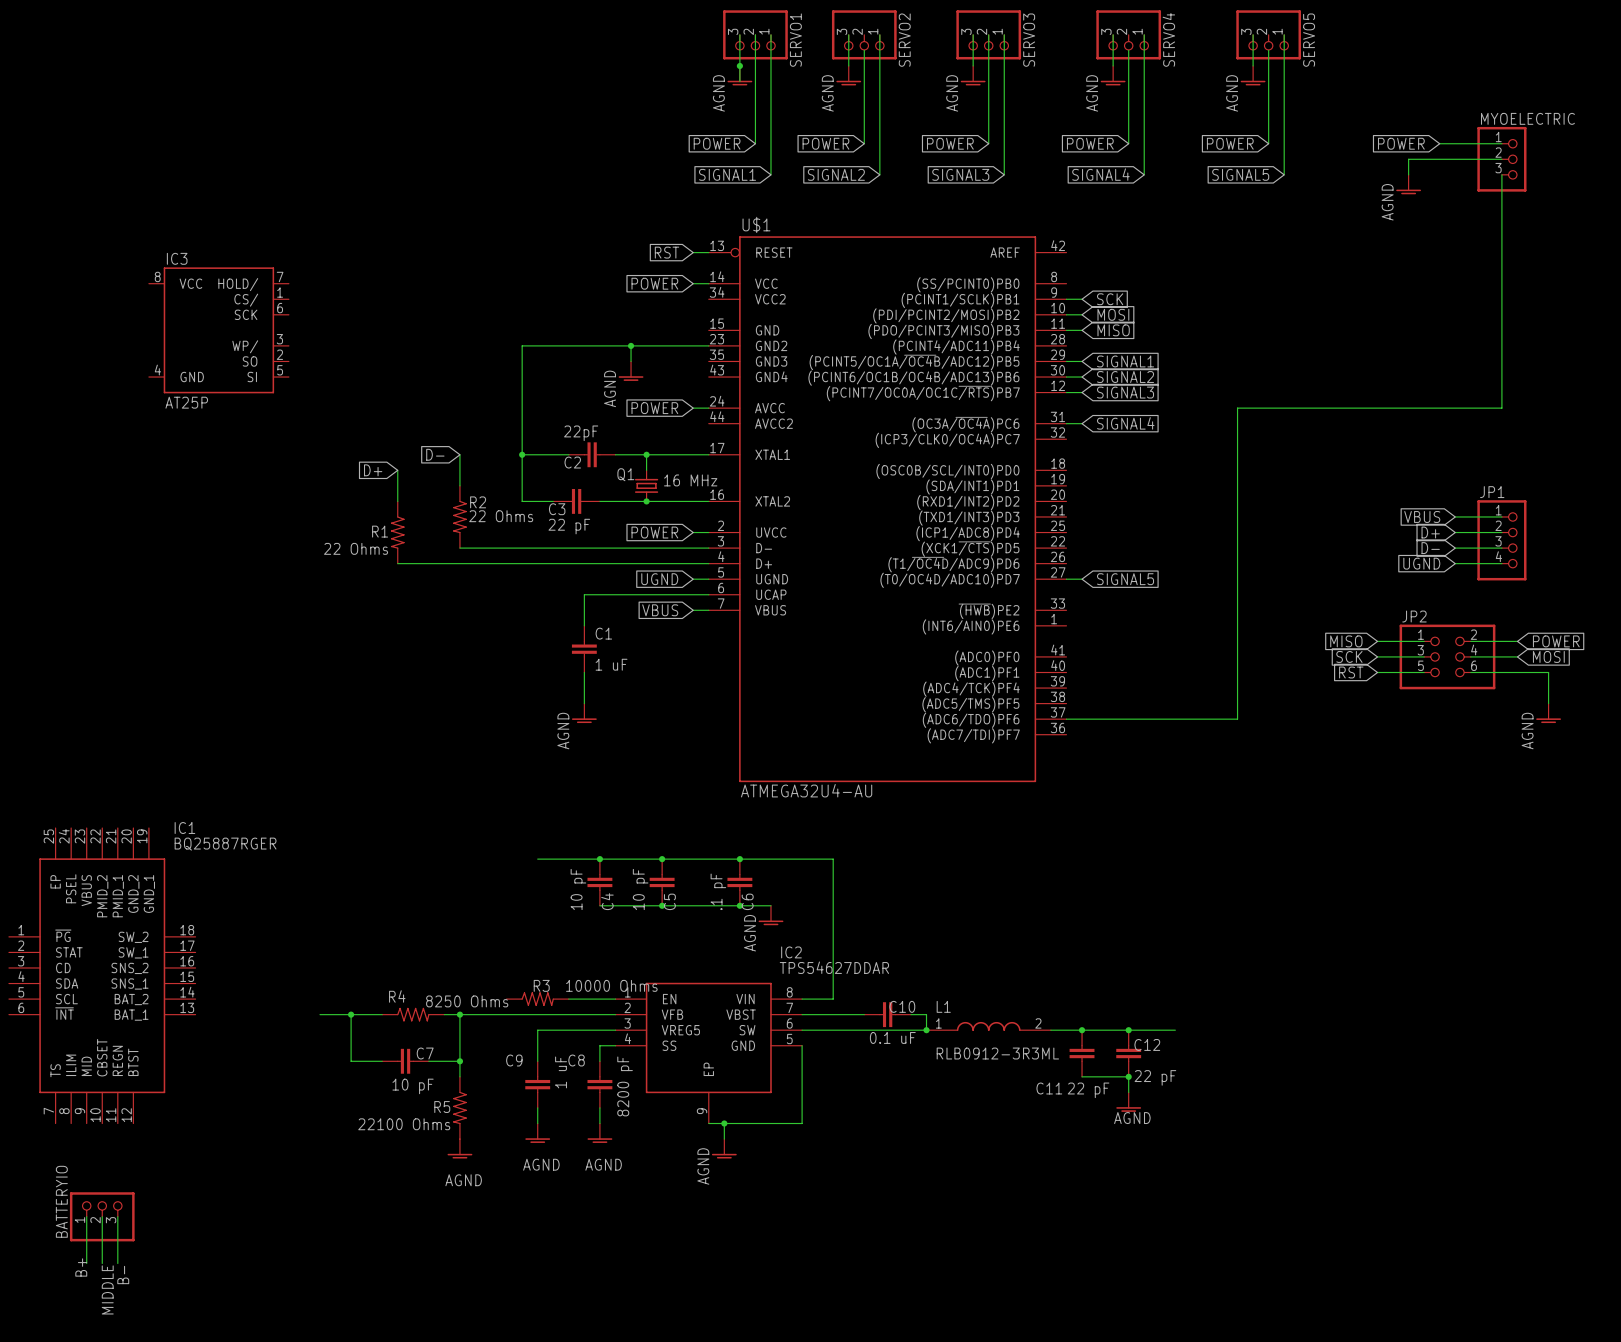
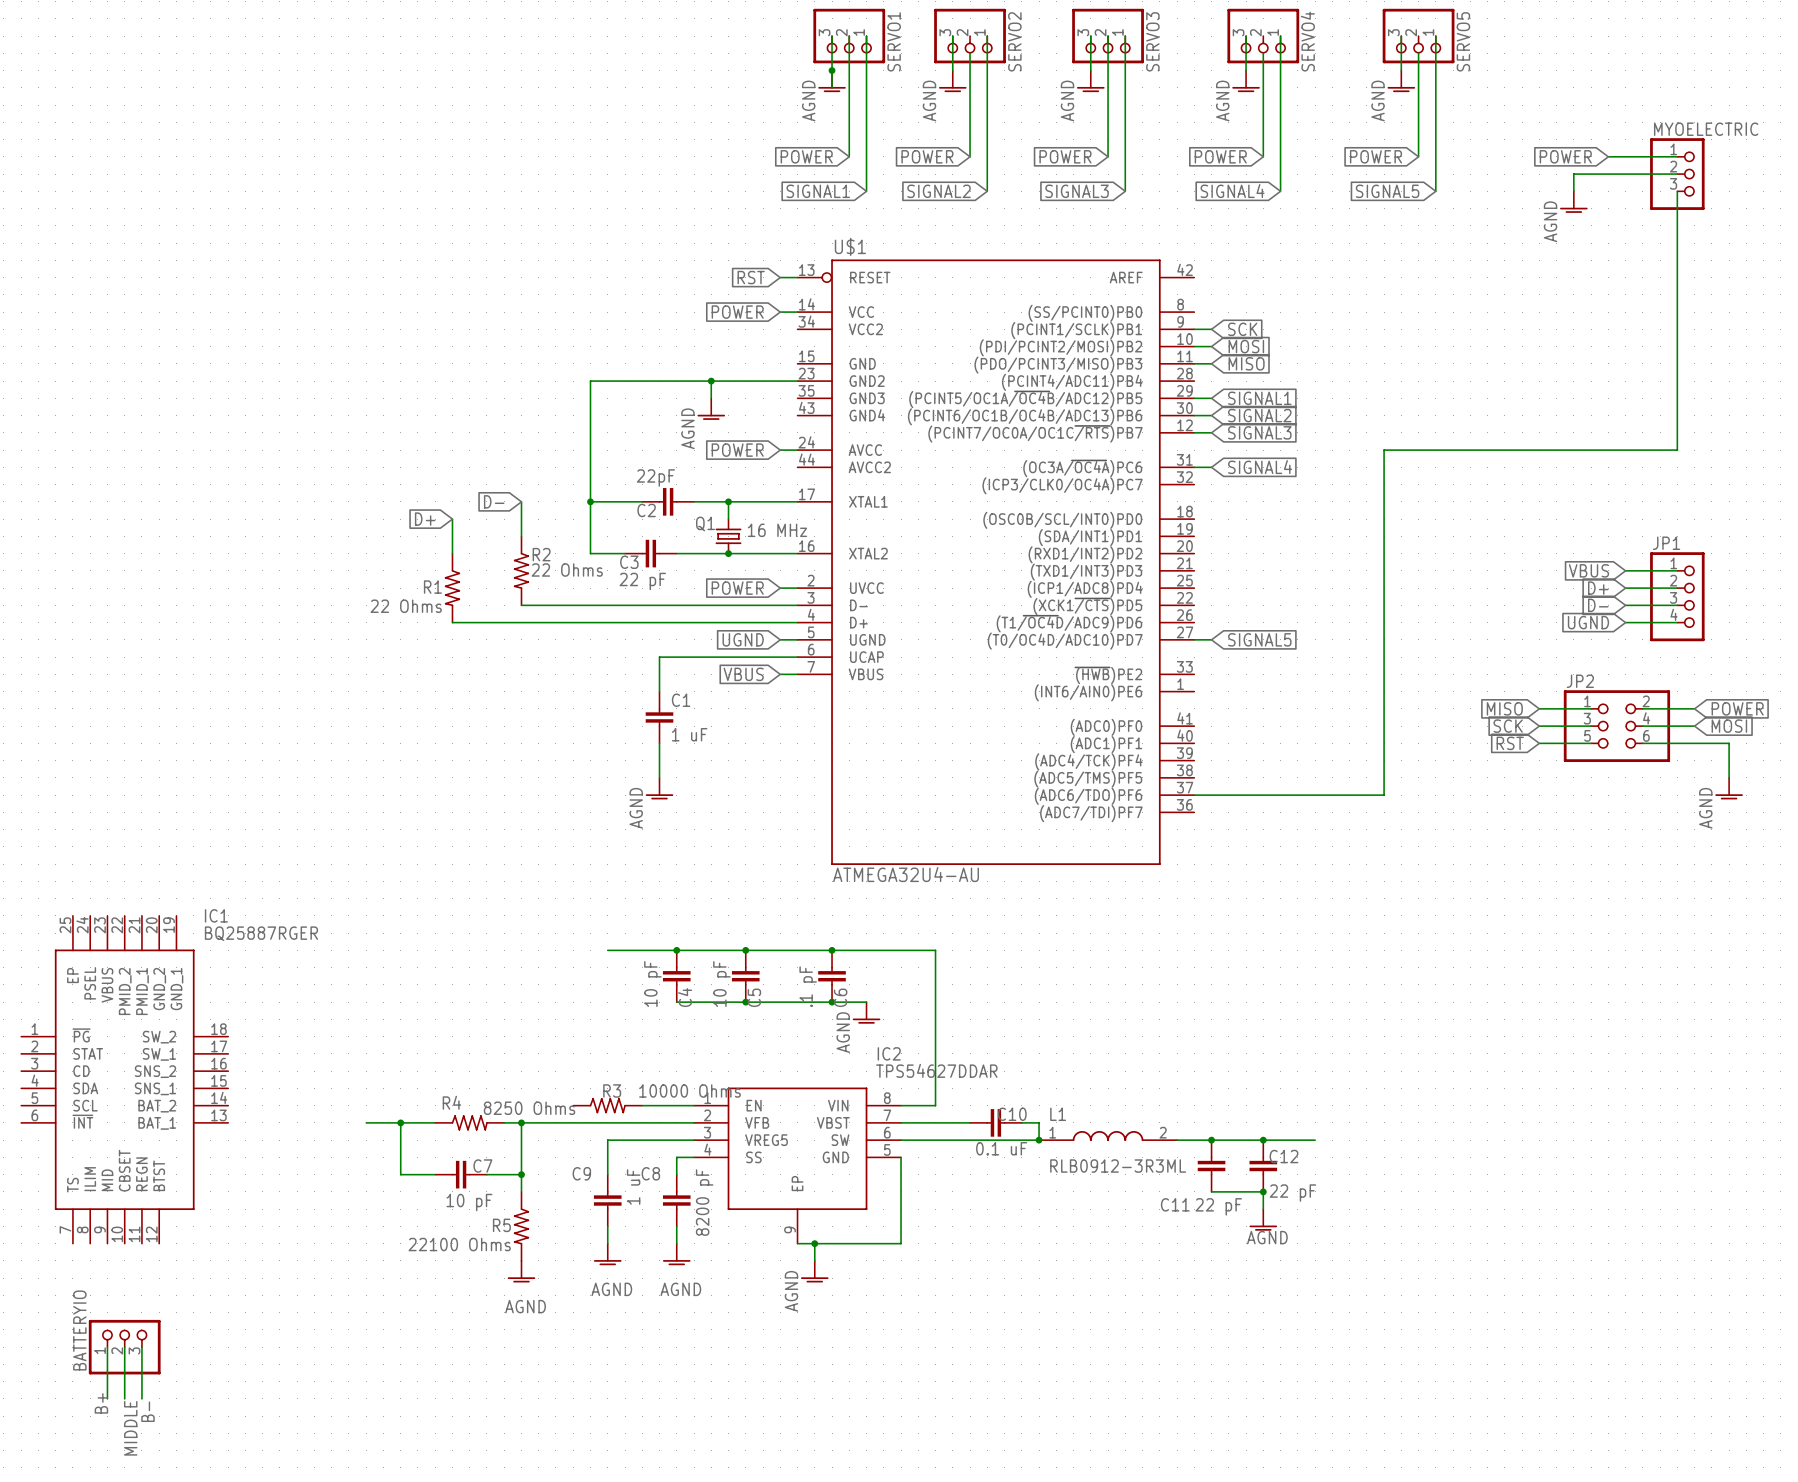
IC3: AT25P (218, 330) -> none

